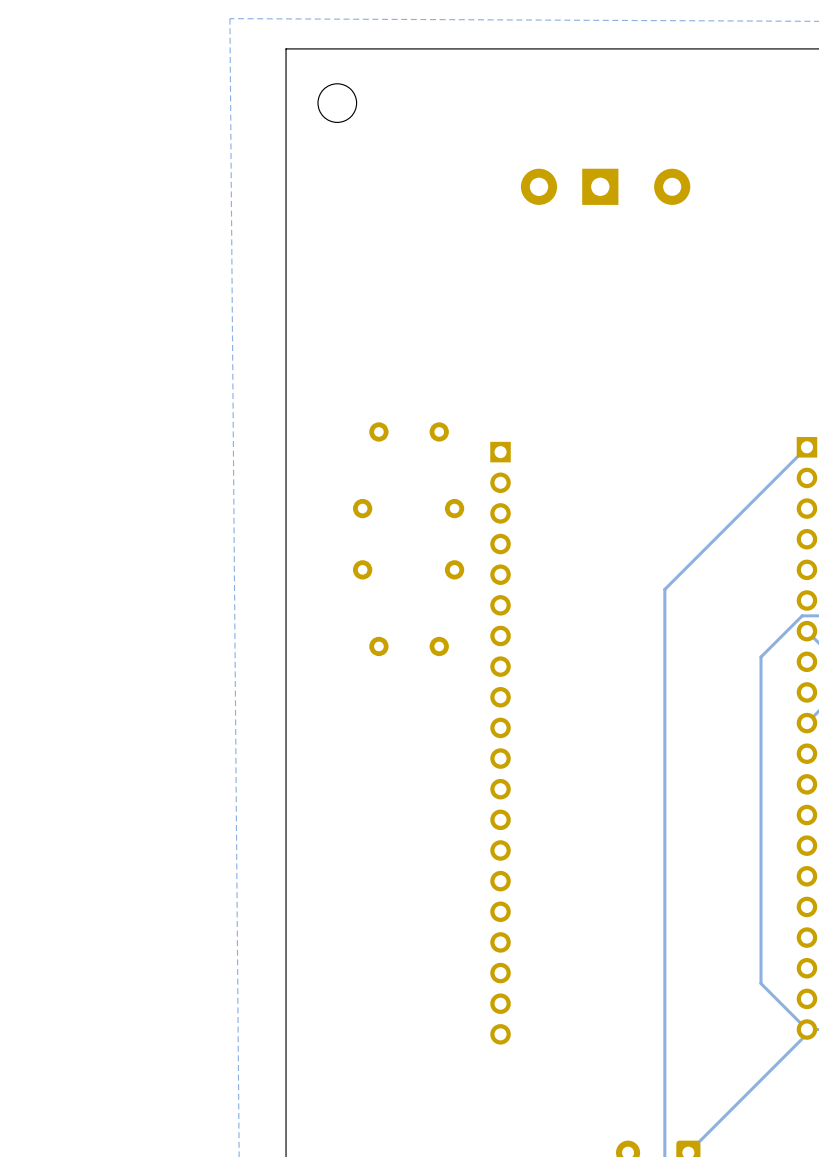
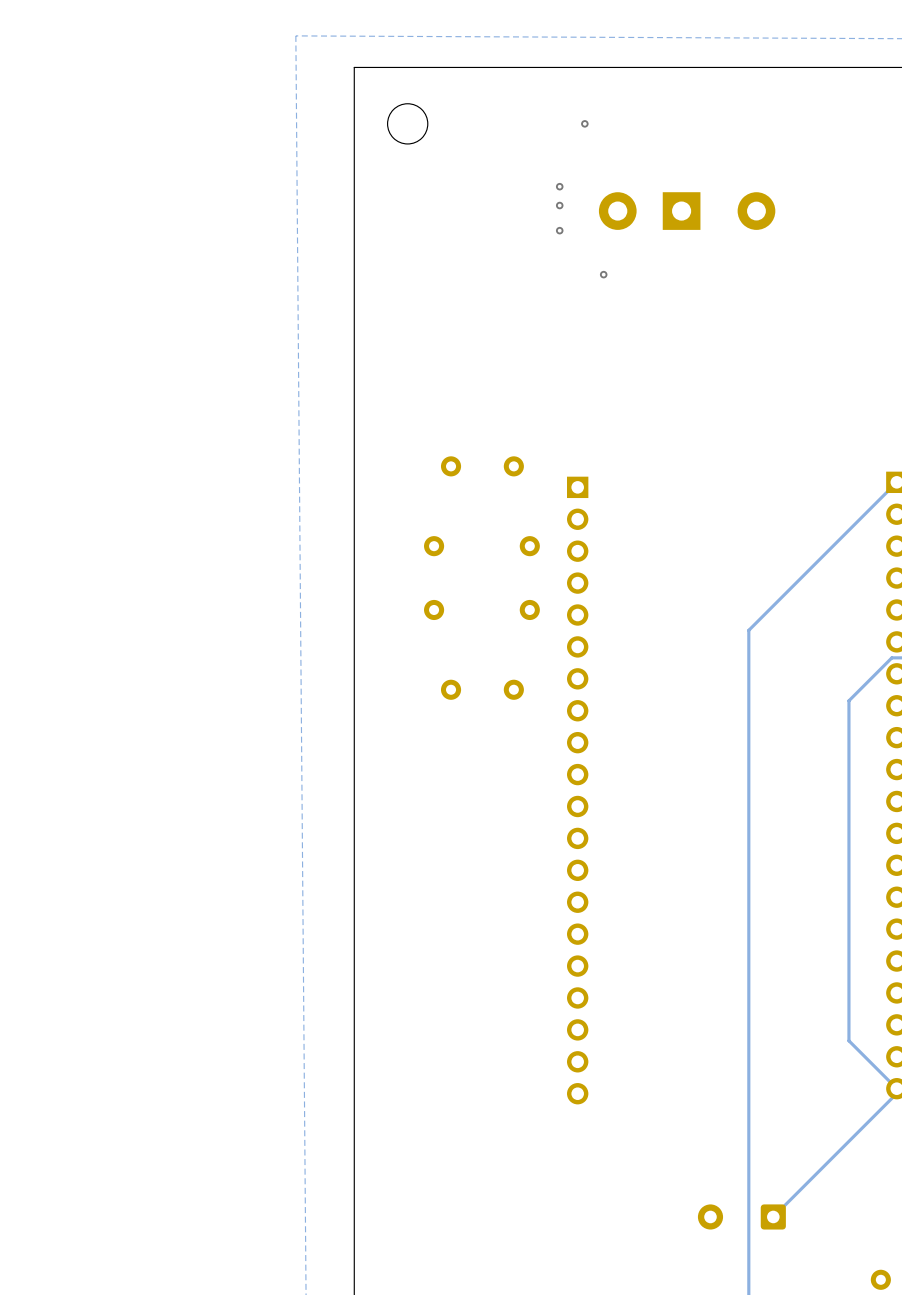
via: none -> (584, 123)
via: none -> (559, 186)
via: none -> (559, 205)
via: none -> (559, 230)
via: none -> (603, 274)

